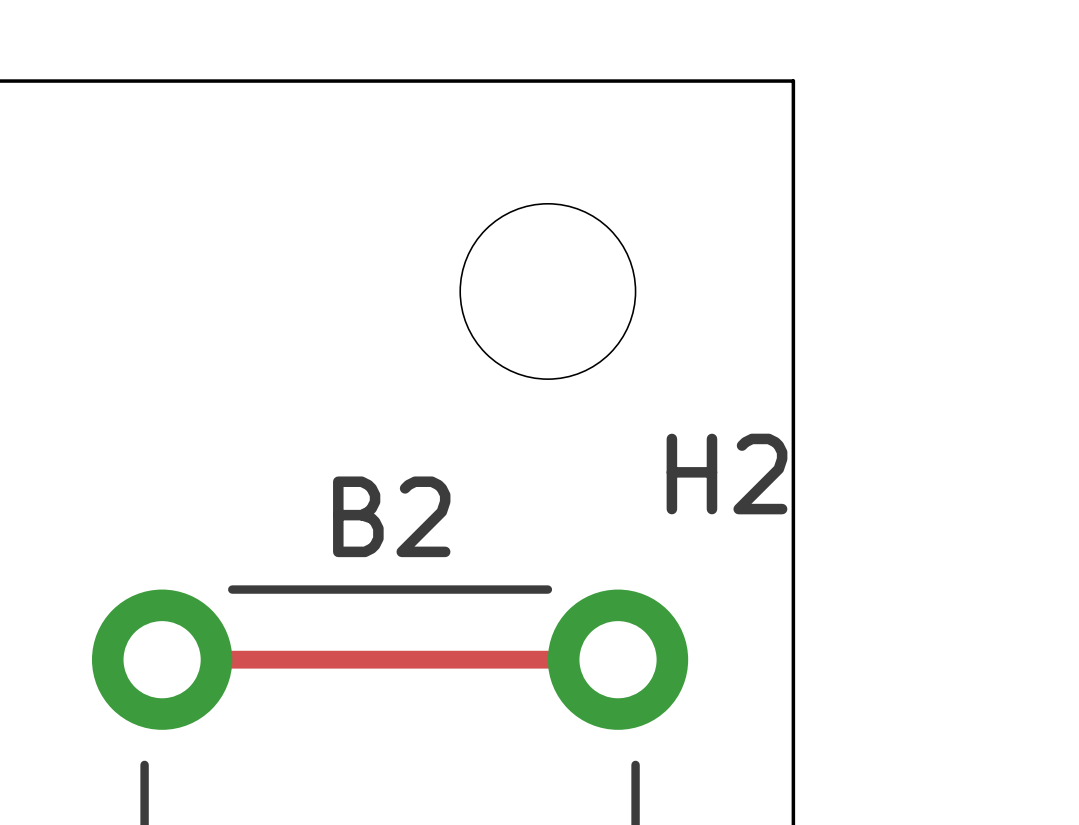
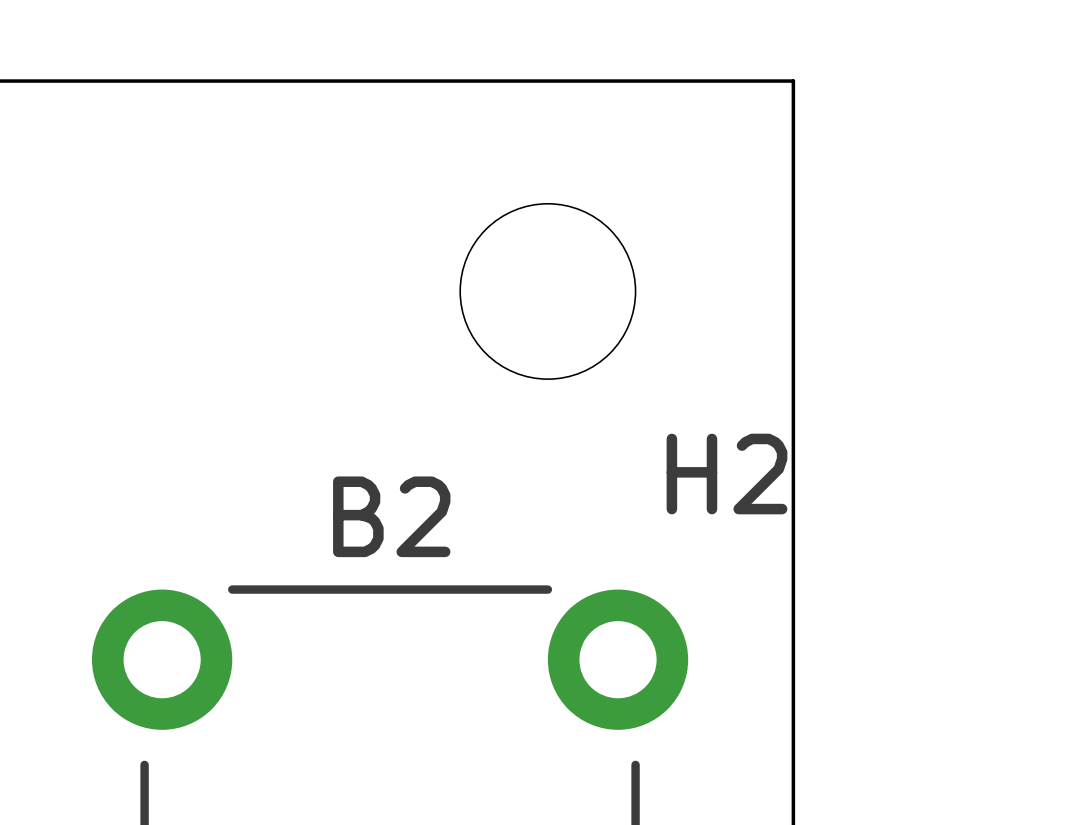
track: (162, 659) (618, 659) -> none

